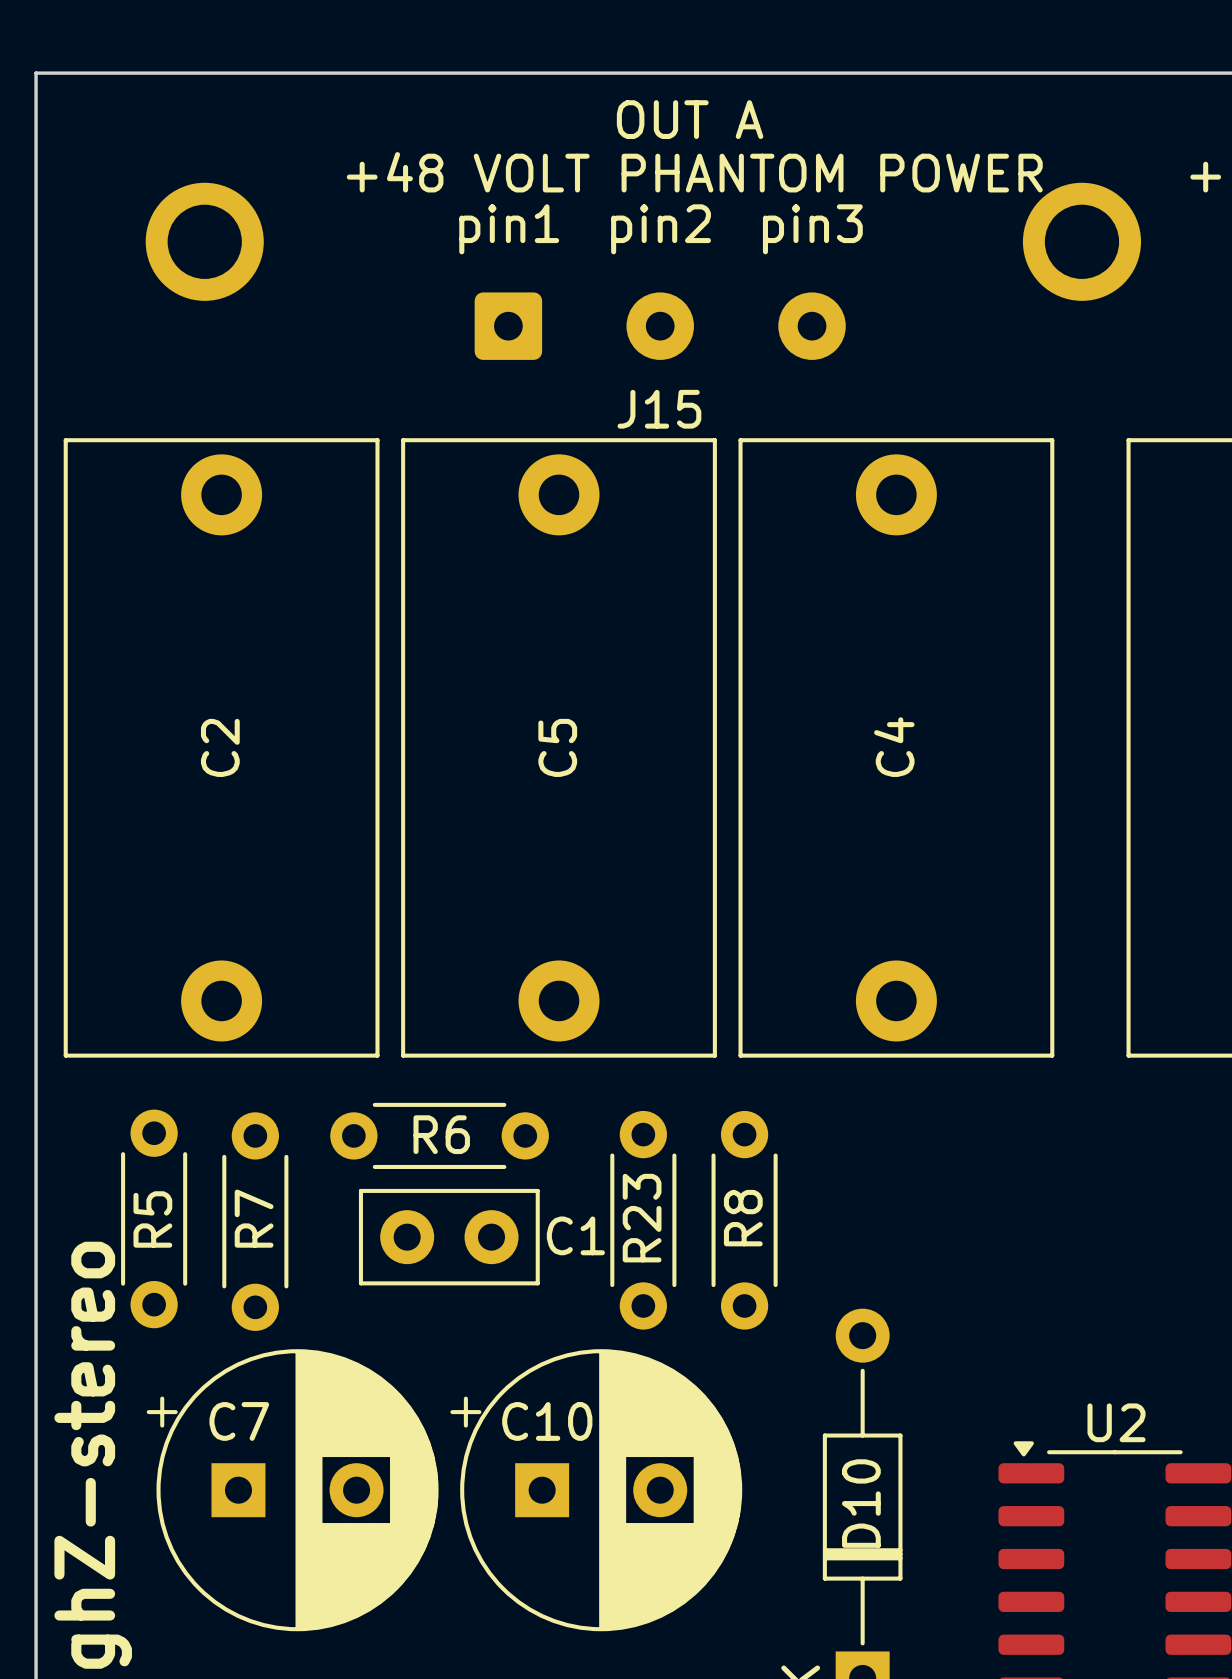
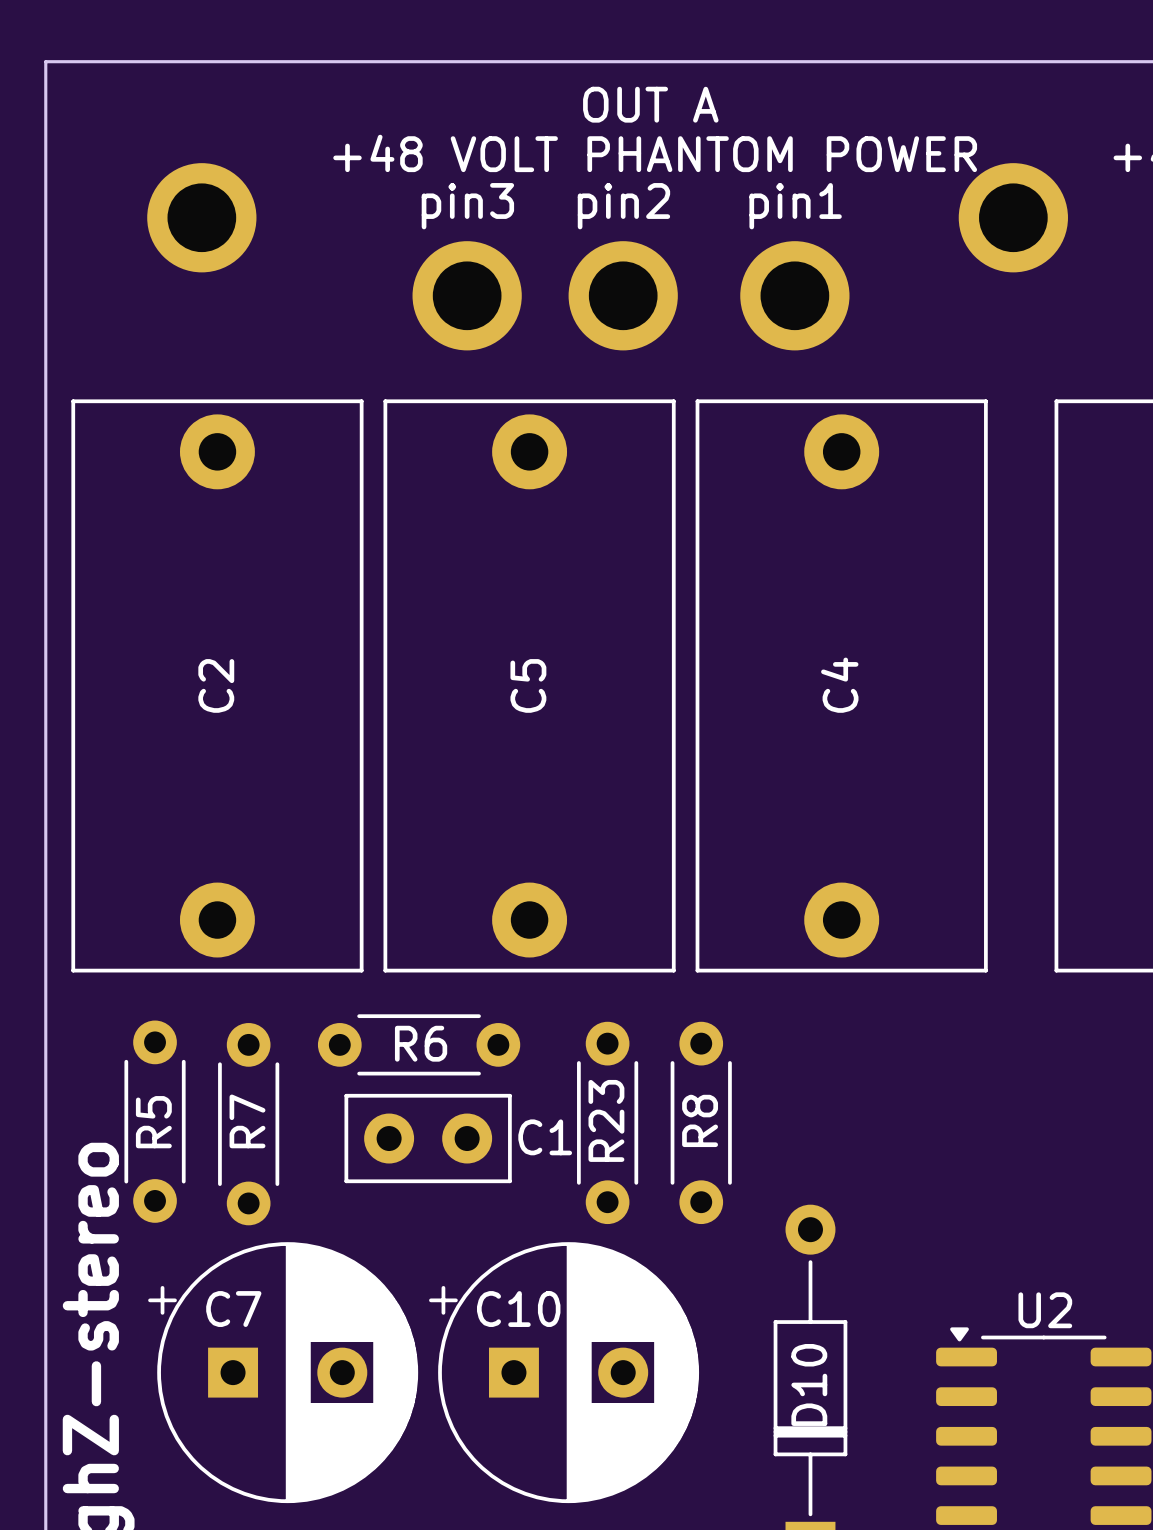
text: pin1 (509, 229) -> pin3 (467, 206)
text: pin3 (812, 229) -> pin1 (795, 206)
part: none -> (467, 295)
J15: (660, 326) -> none
part: none -> (623, 295)
part: none -> (794, 295)

